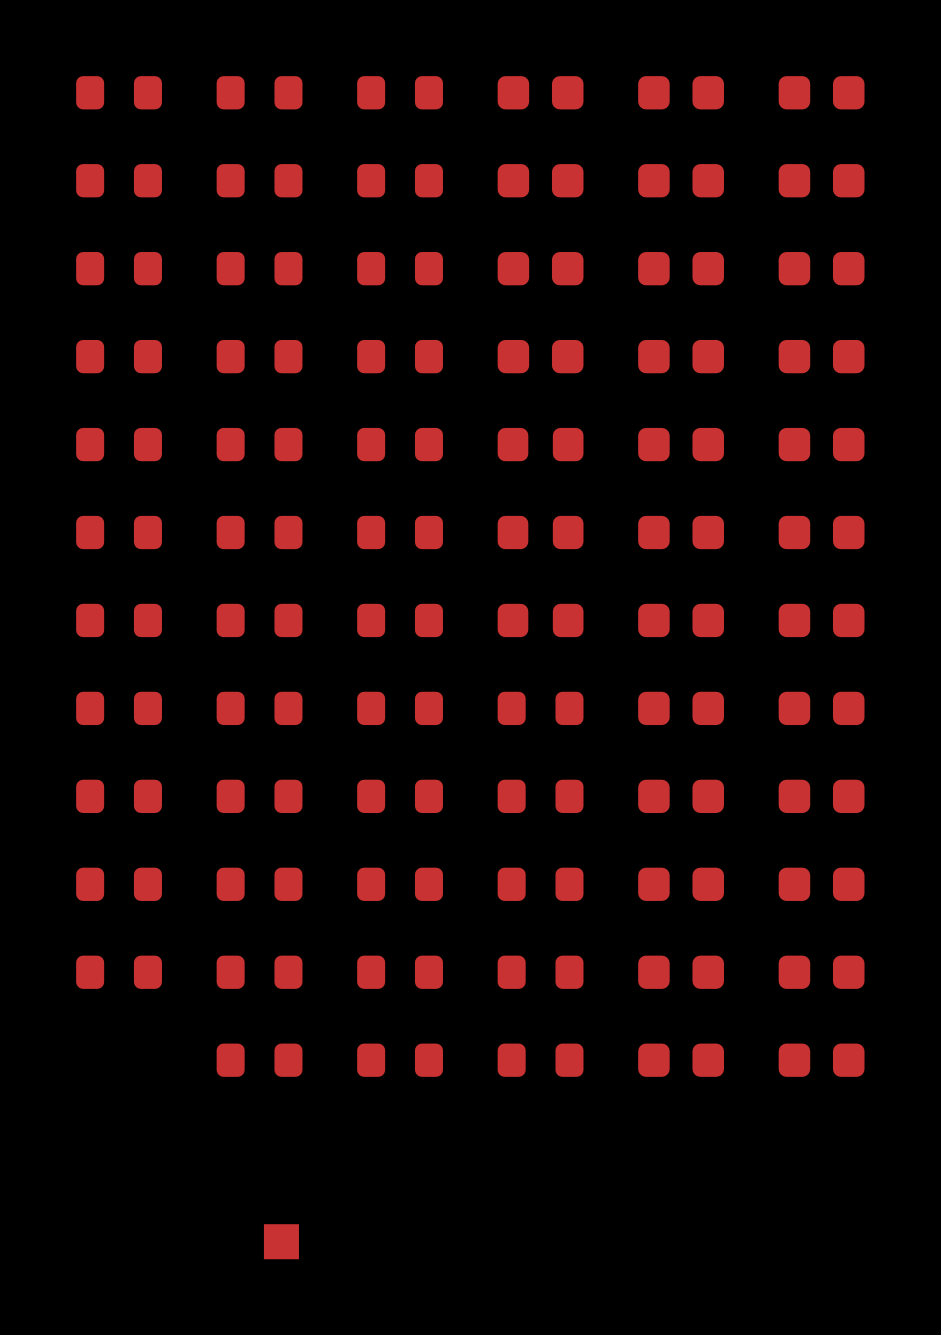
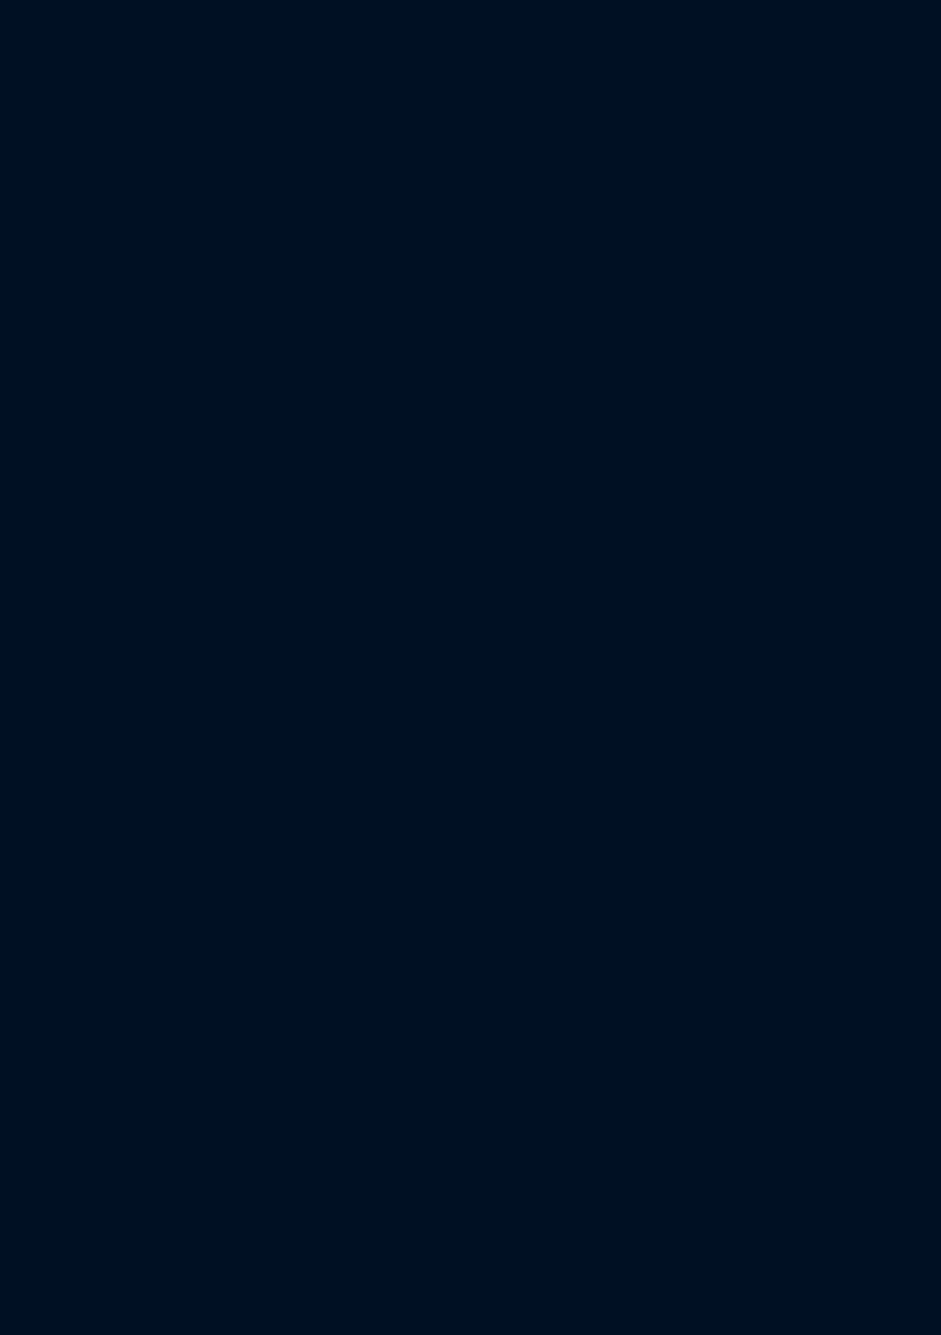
part: (119, 92) -> none
part: (259, 92) -> none
part: (400, 92) -> none
part: (540, 92) -> none
part: (681, 92) -> none
part: (821, 92) -> none
part: (119, 180) -> none
part: (259, 180) -> none
part: (400, 180) -> none
part: (540, 180) -> none
part: (681, 180) -> none
part: (821, 180) -> none
part: (119, 268) -> none
part: (259, 268) -> none
part: (400, 268) -> none
part: (540, 268) -> none
part: (681, 268) -> none
part: (821, 268) -> none
part: (119, 356) -> none
part: (259, 356) -> none
part: (400, 356) -> none
part: (540, 356) -> none
part: (681, 356) -> none
part: (821, 356) -> none
part: (119, 444) -> none
part: (259, 444) -> none
part: (400, 444) -> none
part: (540, 444) -> none
part: (681, 444) -> none
part: (821, 444) -> none
part: (119, 532) -> none
part: (259, 532) -> none
part: (400, 532) -> none
part: (540, 532) -> none
part: (681, 532) -> none
part: (821, 532) -> none
part: (119, 620) -> none
part: (259, 620) -> none
part: (400, 620) -> none
part: (540, 620) -> none
part: (681, 620) -> none
part: (821, 620) -> none
part: (119, 708) -> none
part: (259, 708) -> none
part: (400, 708) -> none
part: (540, 708) -> none
part: (681, 708) -> none
part: (821, 708) -> none
part: (119, 796) -> none
part: (259, 796) -> none
part: (400, 796) -> none
part: (540, 796) -> none
part: (681, 796) -> none
part: (821, 796) -> none
part: (119, 884) -> none
part: (259, 884) -> none
part: (400, 884) -> none
part: (540, 884) -> none
part: (681, 884) -> none
part: (821, 884) -> none
part: (119, 972) -> none
part: (259, 972) -> none
part: (400, 972) -> none
part: (540, 972) -> none
part: (681, 972) -> none
part: (821, 972) -> none
part: (259, 1060) -> none
part: (400, 1060) -> none
part: (540, 1060) -> none
part: (681, 1060) -> none
part: (821, 1060) -> none
part: (281, 1241) -> none

